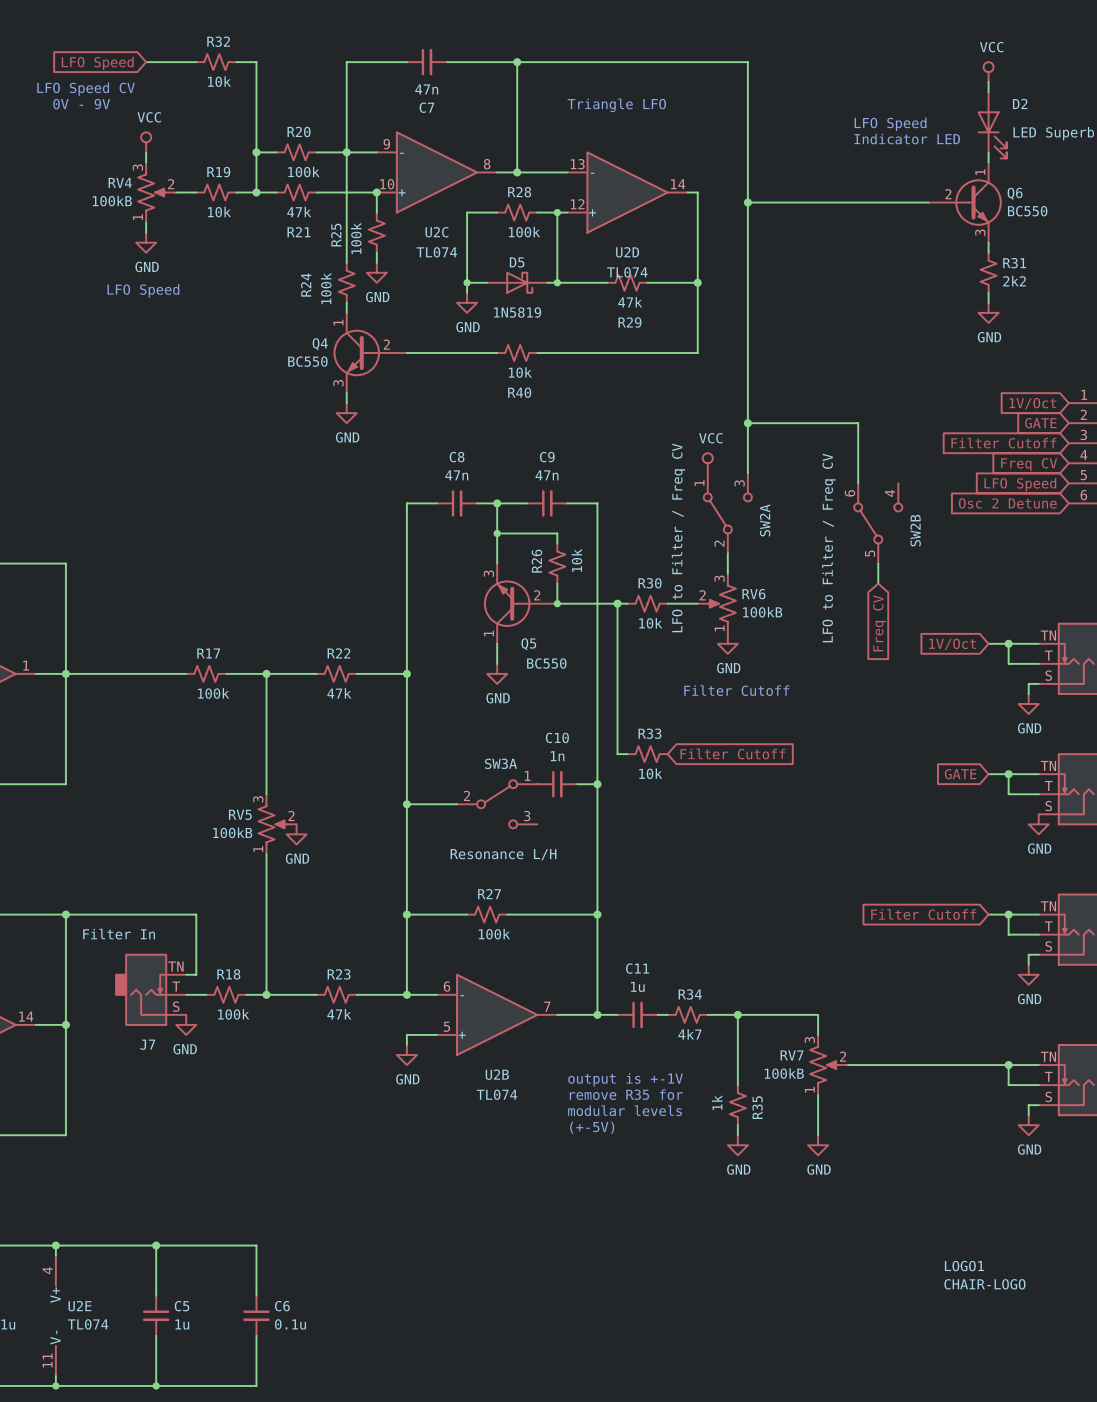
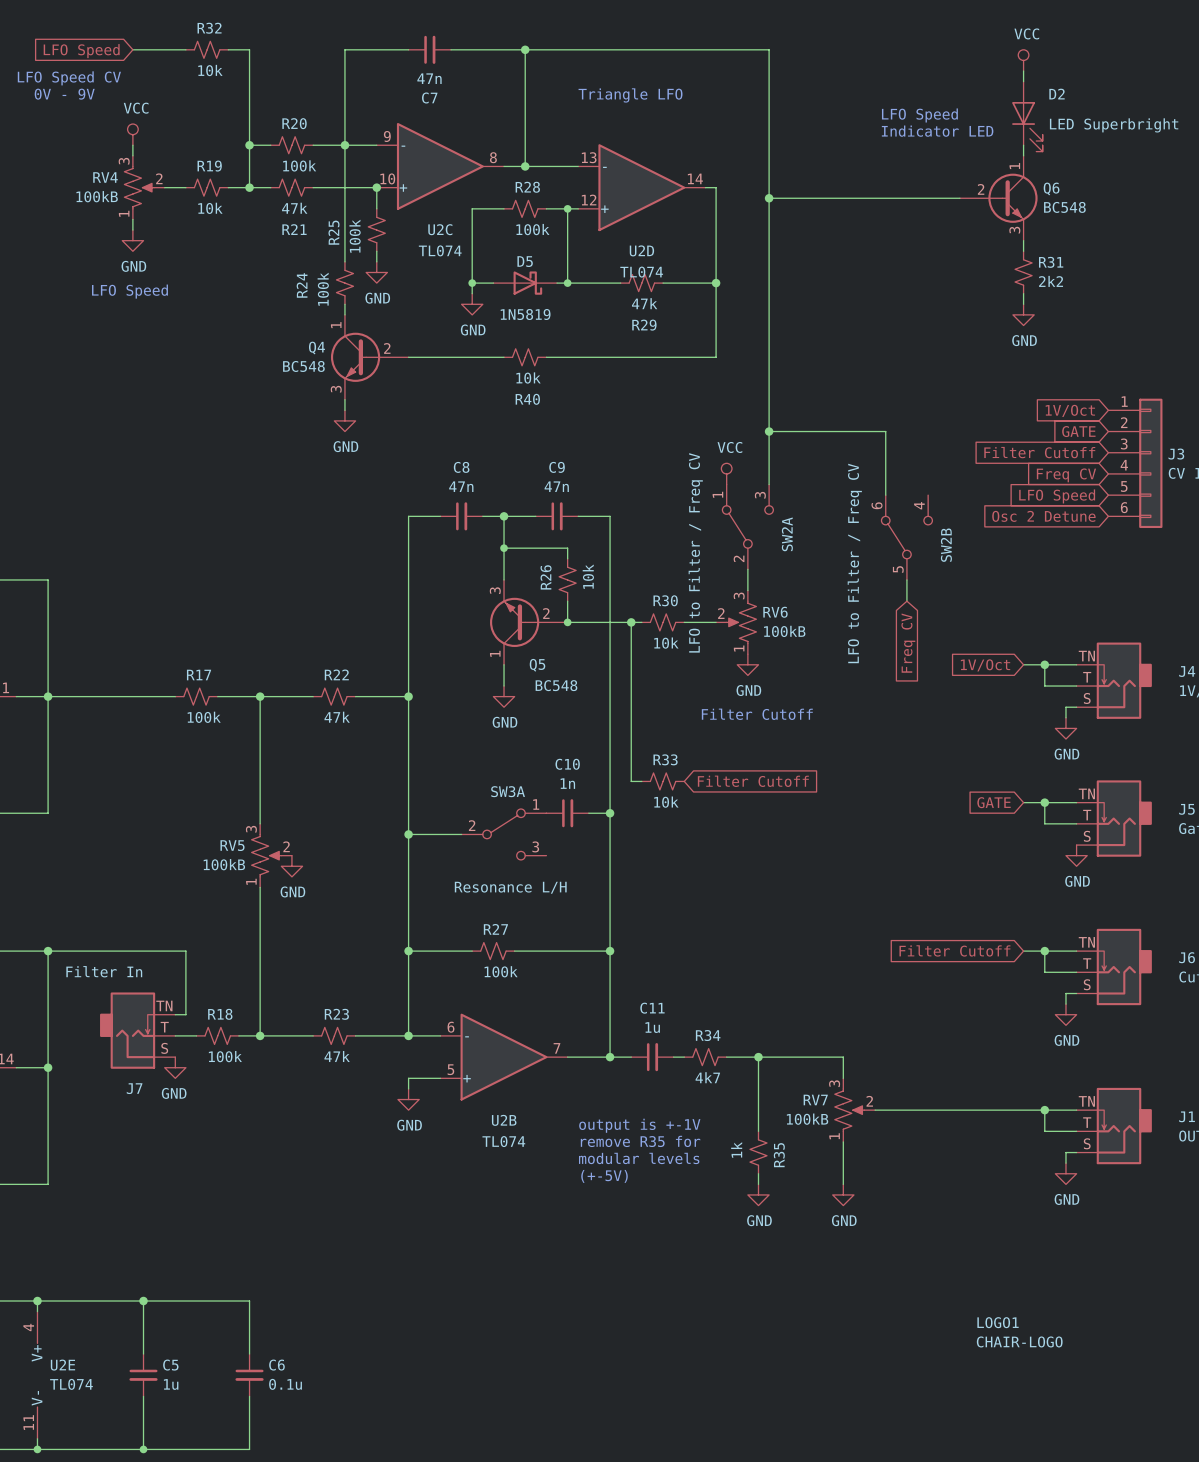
Q6 value: BC550 (1027, 211) -> BC548 (1064, 207)
Q4 value: BC550 (307, 361) -> BC548 (303, 366)
Q5 value: BC550 (546, 663) -> BC548 (556, 685)

